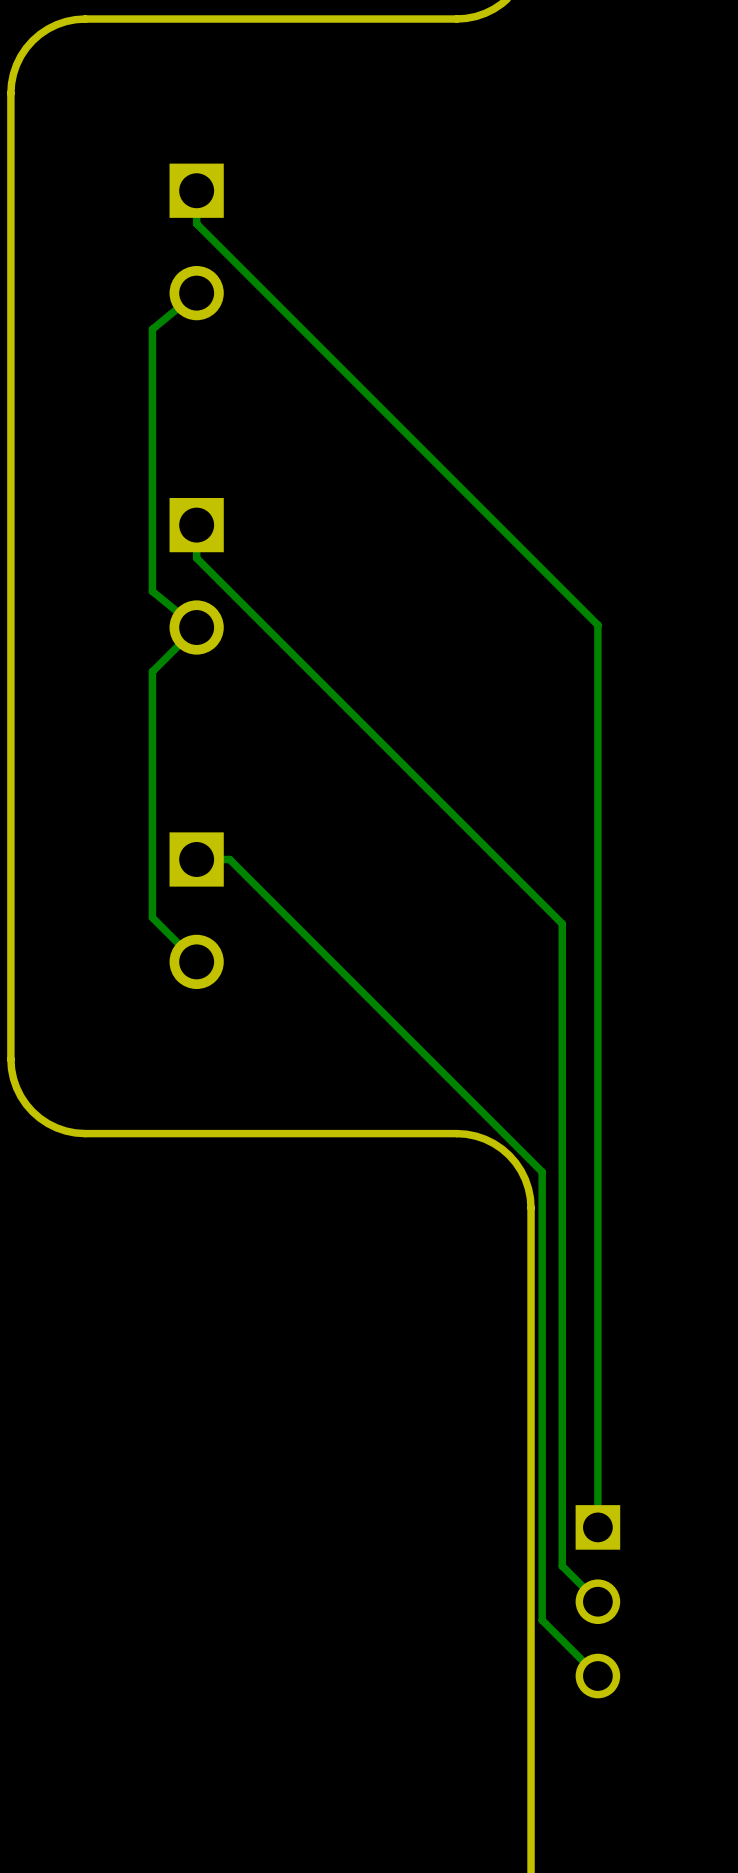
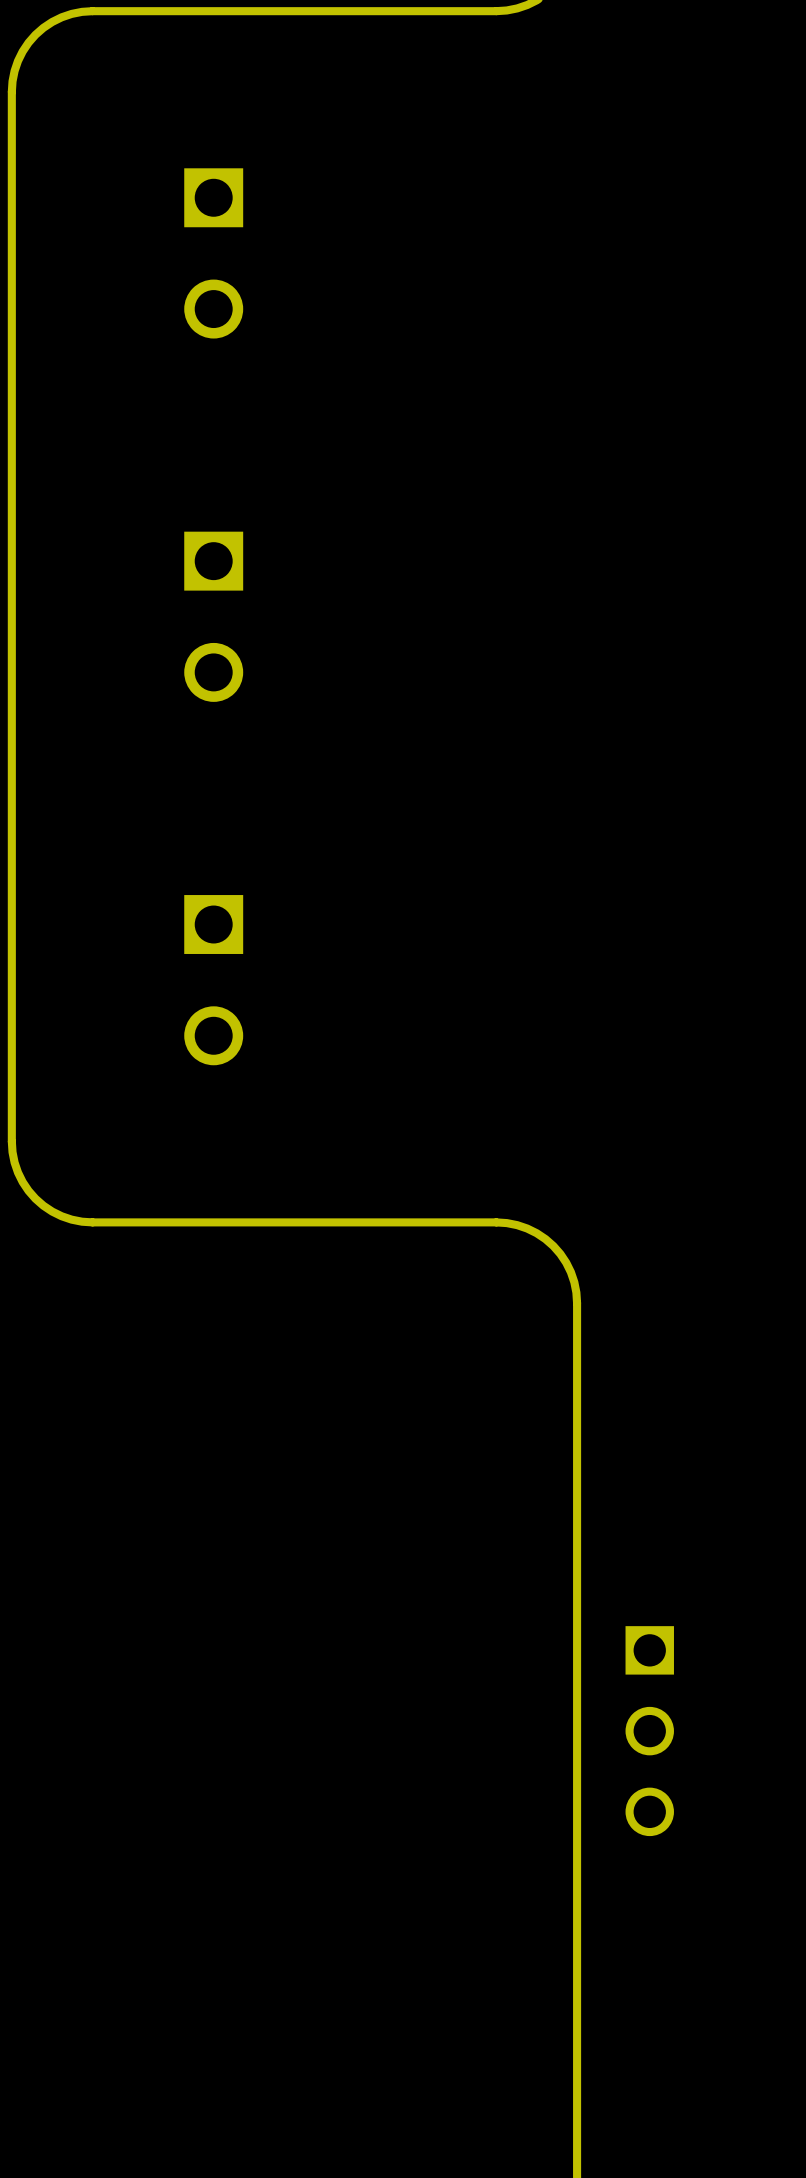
track: (196, 190) (196, 223) (597, 625) (597, 1527) -> none
track: (196, 293) (152, 329) (152, 591) (196, 627) (152, 671) (152, 917) (196, 961) -> none
track: (196, 525) (196, 558) (562, 923) (562, 1566) (597, 1601) -> none
track: (196, 859) (229, 859) (542, 1171) (542, 1620) (597, 1676) -> none

